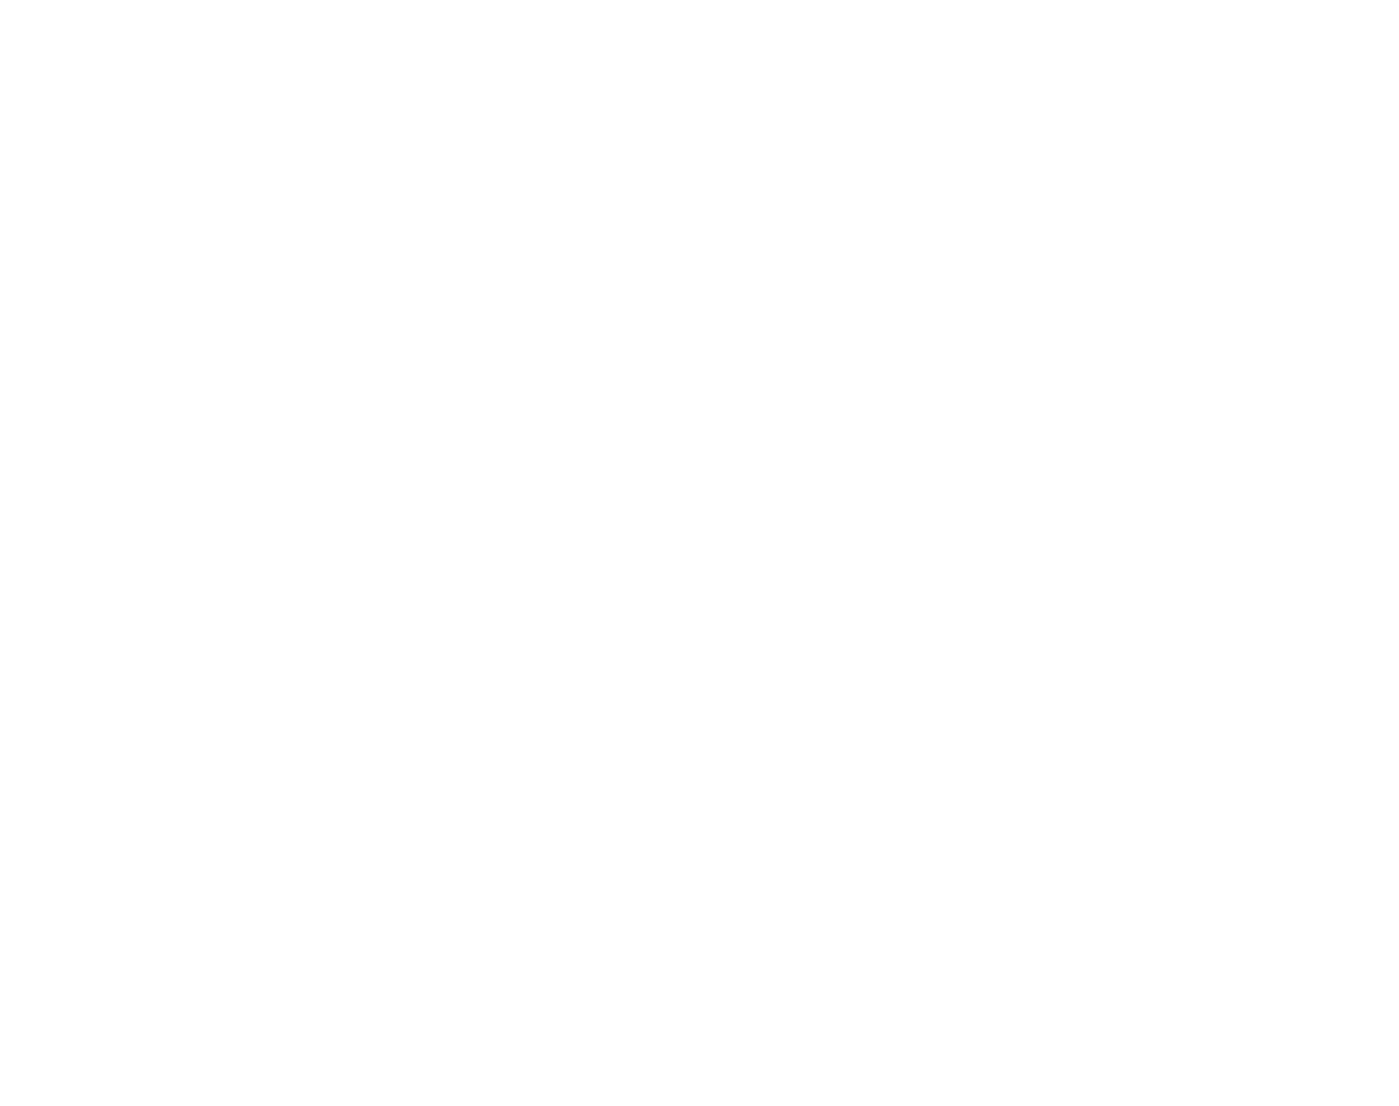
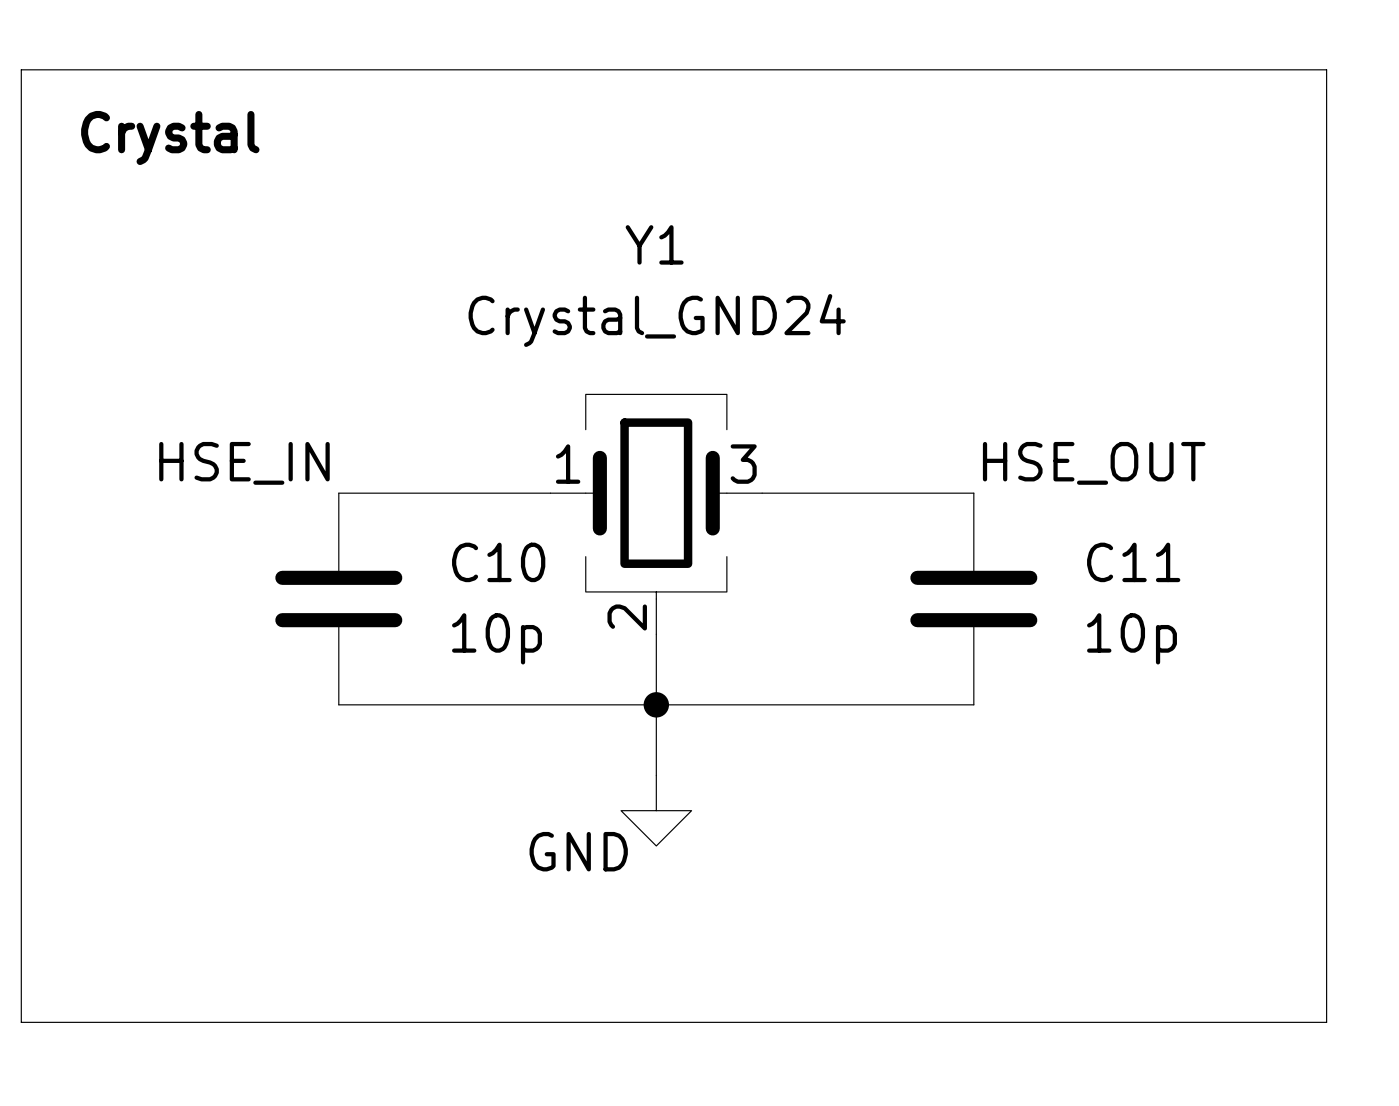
line: none -> (21, 69) (1326, 69) (1326, 1022) (21, 1022) (21, 69)
text: none -> Crystal (170, 138)
label: none -> HSE_IN (244, 463)
label: none -> HSE_OUT (1094, 463)
wire: none -> (338, 493) (550, 493)
wire: none -> (762, 493) (973, 493)
Y1: none -> Crystal_GND24 (656, 514)
C10: none -> 10p (338, 599)
C11: none -> 10p (973, 599)
wire: none -> (656, 634) (656, 775)
wire: none -> (338, 704) (973, 704)
junction: none -> (656, 704)
power symbol: none -> GND (656, 810)

